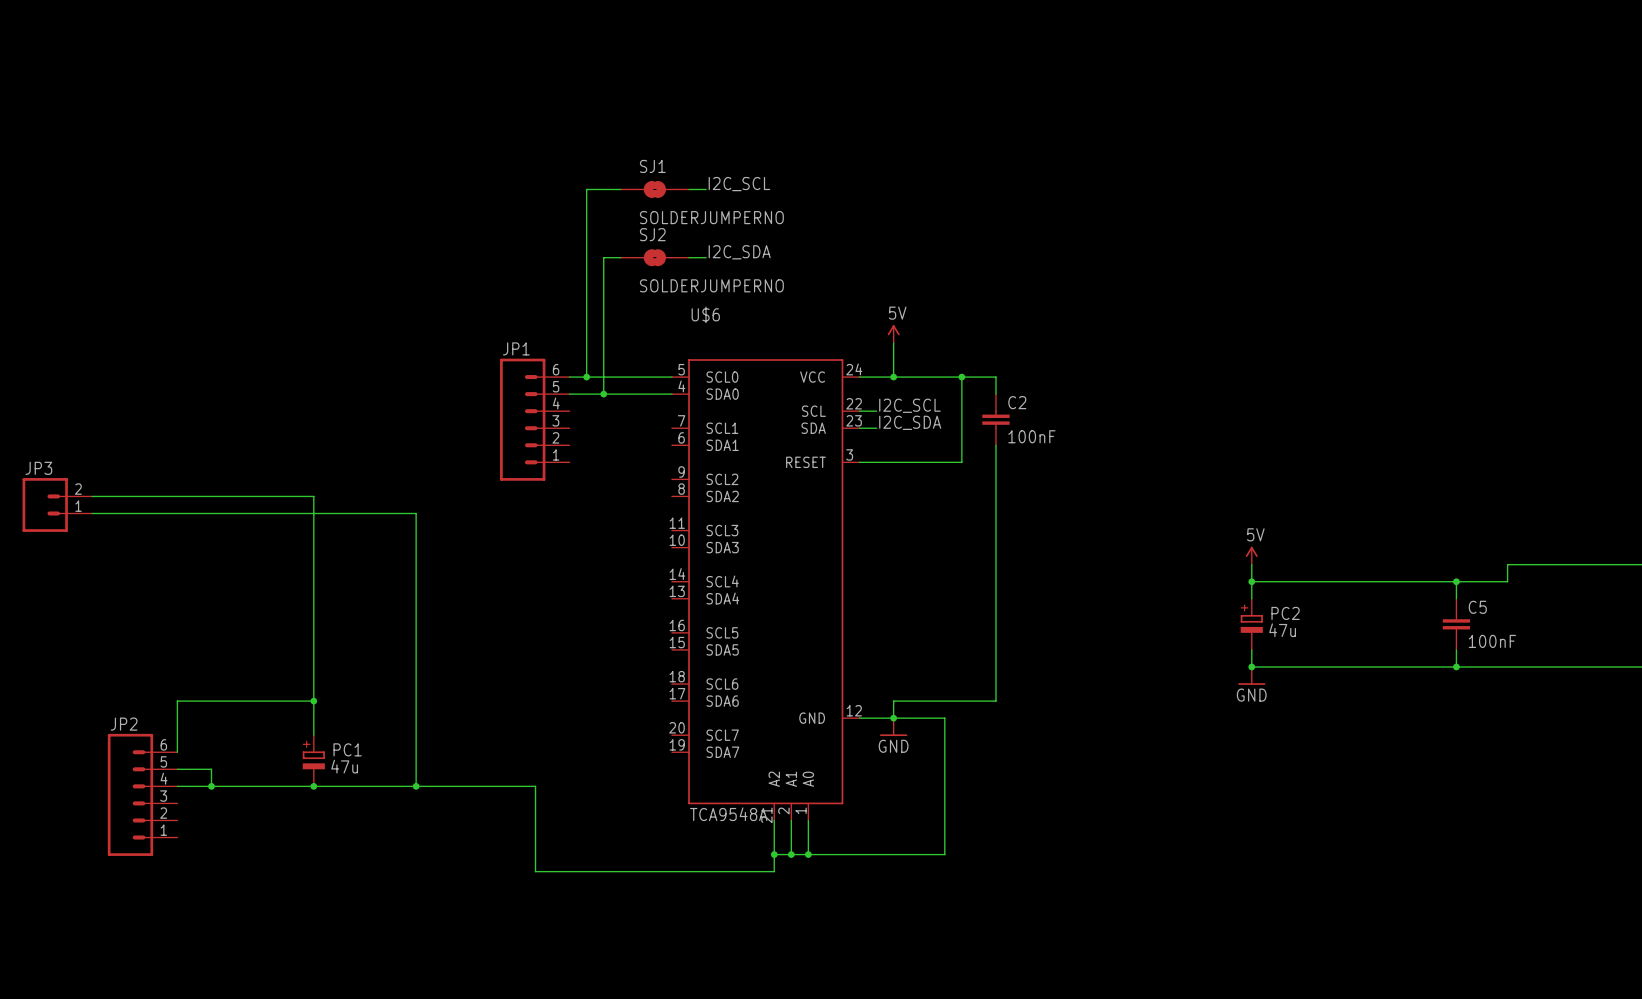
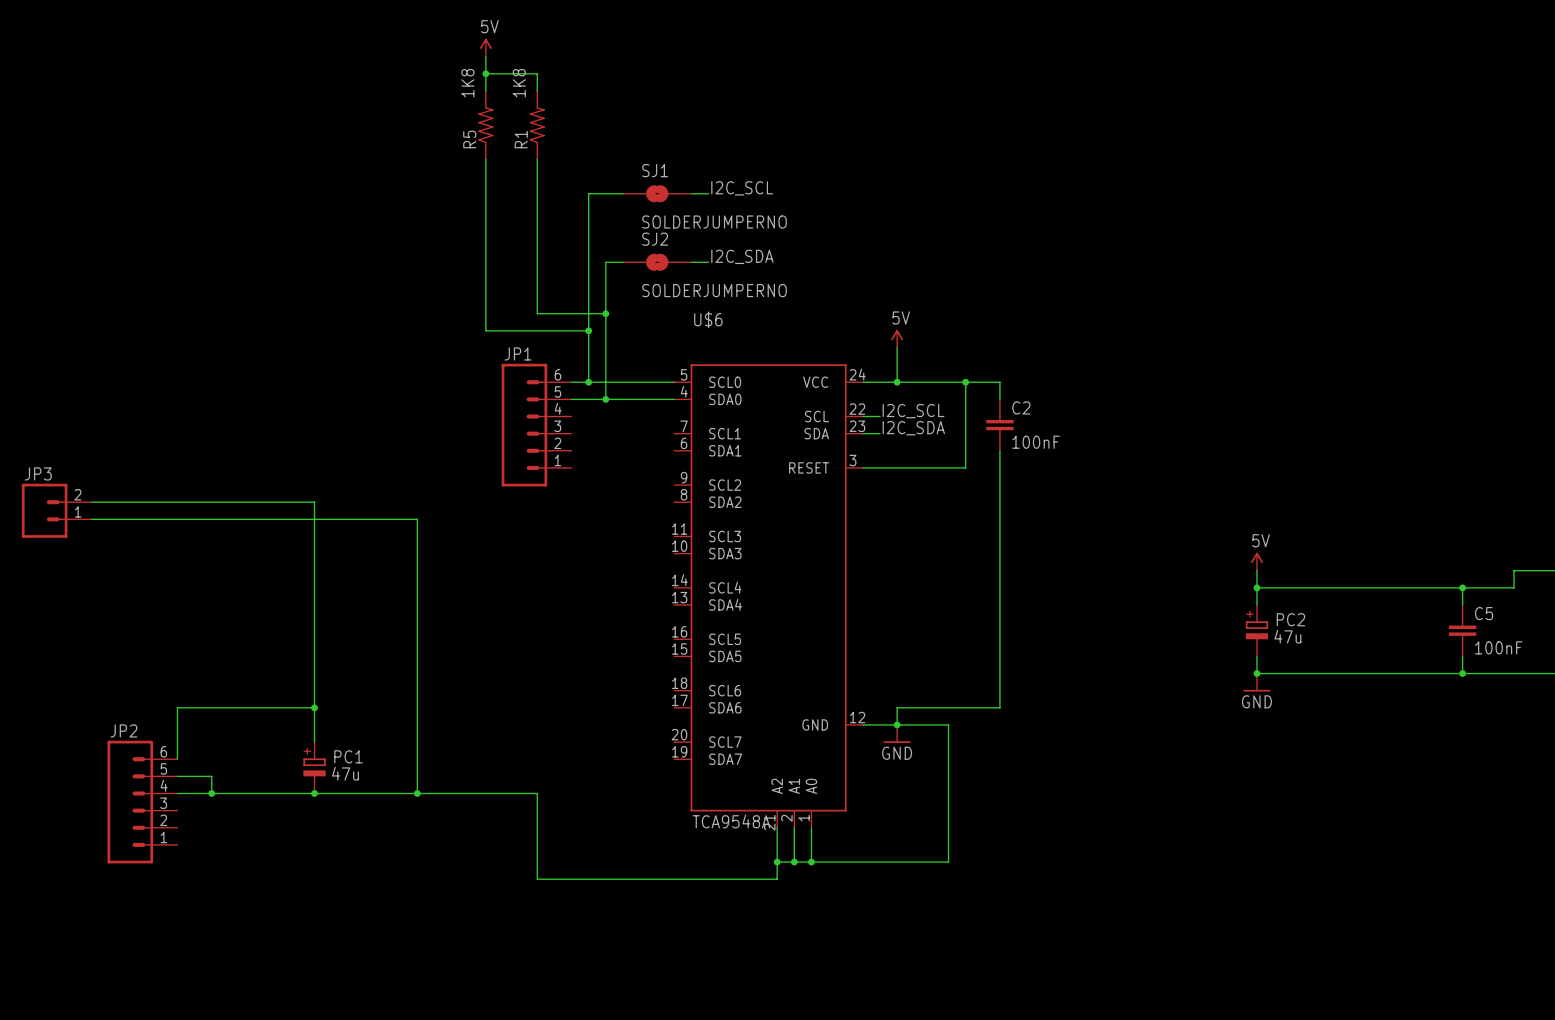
power symbol: none -> 5V (485, 47)
wire: none -> (485, 56) (485, 90)
wire: none -> (485, 73) (537, 73) (537, 90)
junction: none -> (485, 73)
R5: none -> 1K8 (485, 125)
R1: none -> 1K8 (537, 125)
wire: none -> (485, 159) (485, 330) (588, 330)
wire: none -> (537, 159) (537, 313) (605, 313)
junction: none -> (605, 313)
junction: none -> (588, 330)

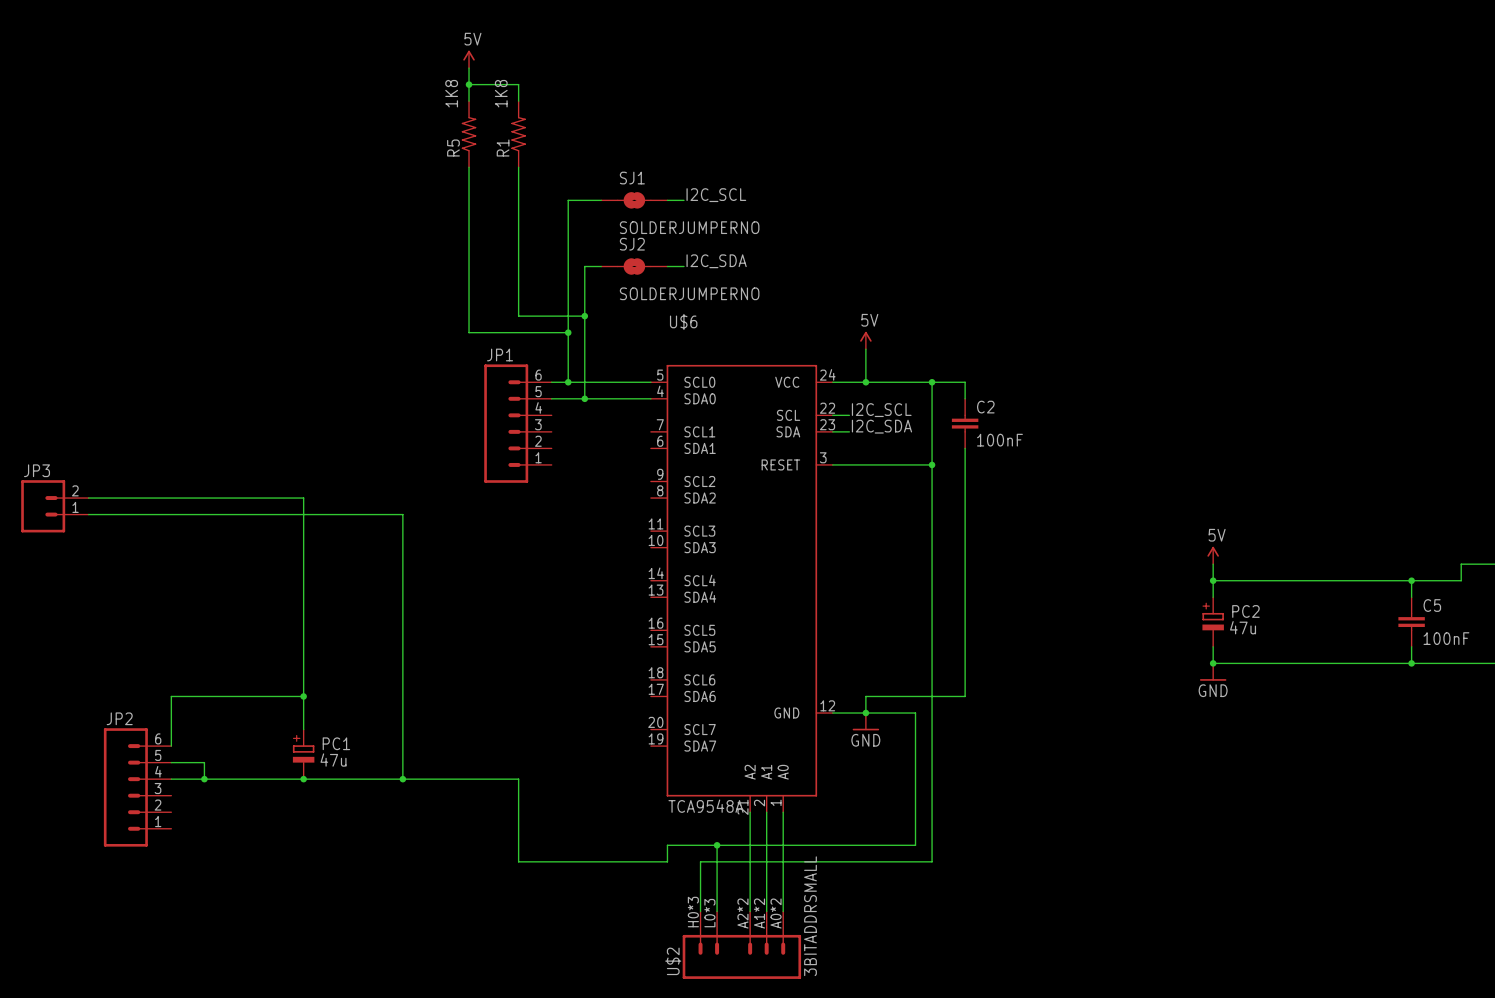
wire: none -> (932, 464) (932, 861) (750, 861) (750, 911)
junction: none -> (932, 464)
wire: none -> (717, 845) (717, 911)
junction: none -> (717, 845)
junction: (777, 862) -> none
wire: none -> (766, 845) (766, 911)
junction: (794, 862) -> none
wire: none -> (783, 845) (783, 911)
junction: (811, 862) -> none
wire: (691, 879) (725, 879) -> (667, 861) (667, 845) (750, 845)
wire: none -> (700, 861) (700, 911)
U$2: none -> 3BITADDRSMALL (741, 945)

